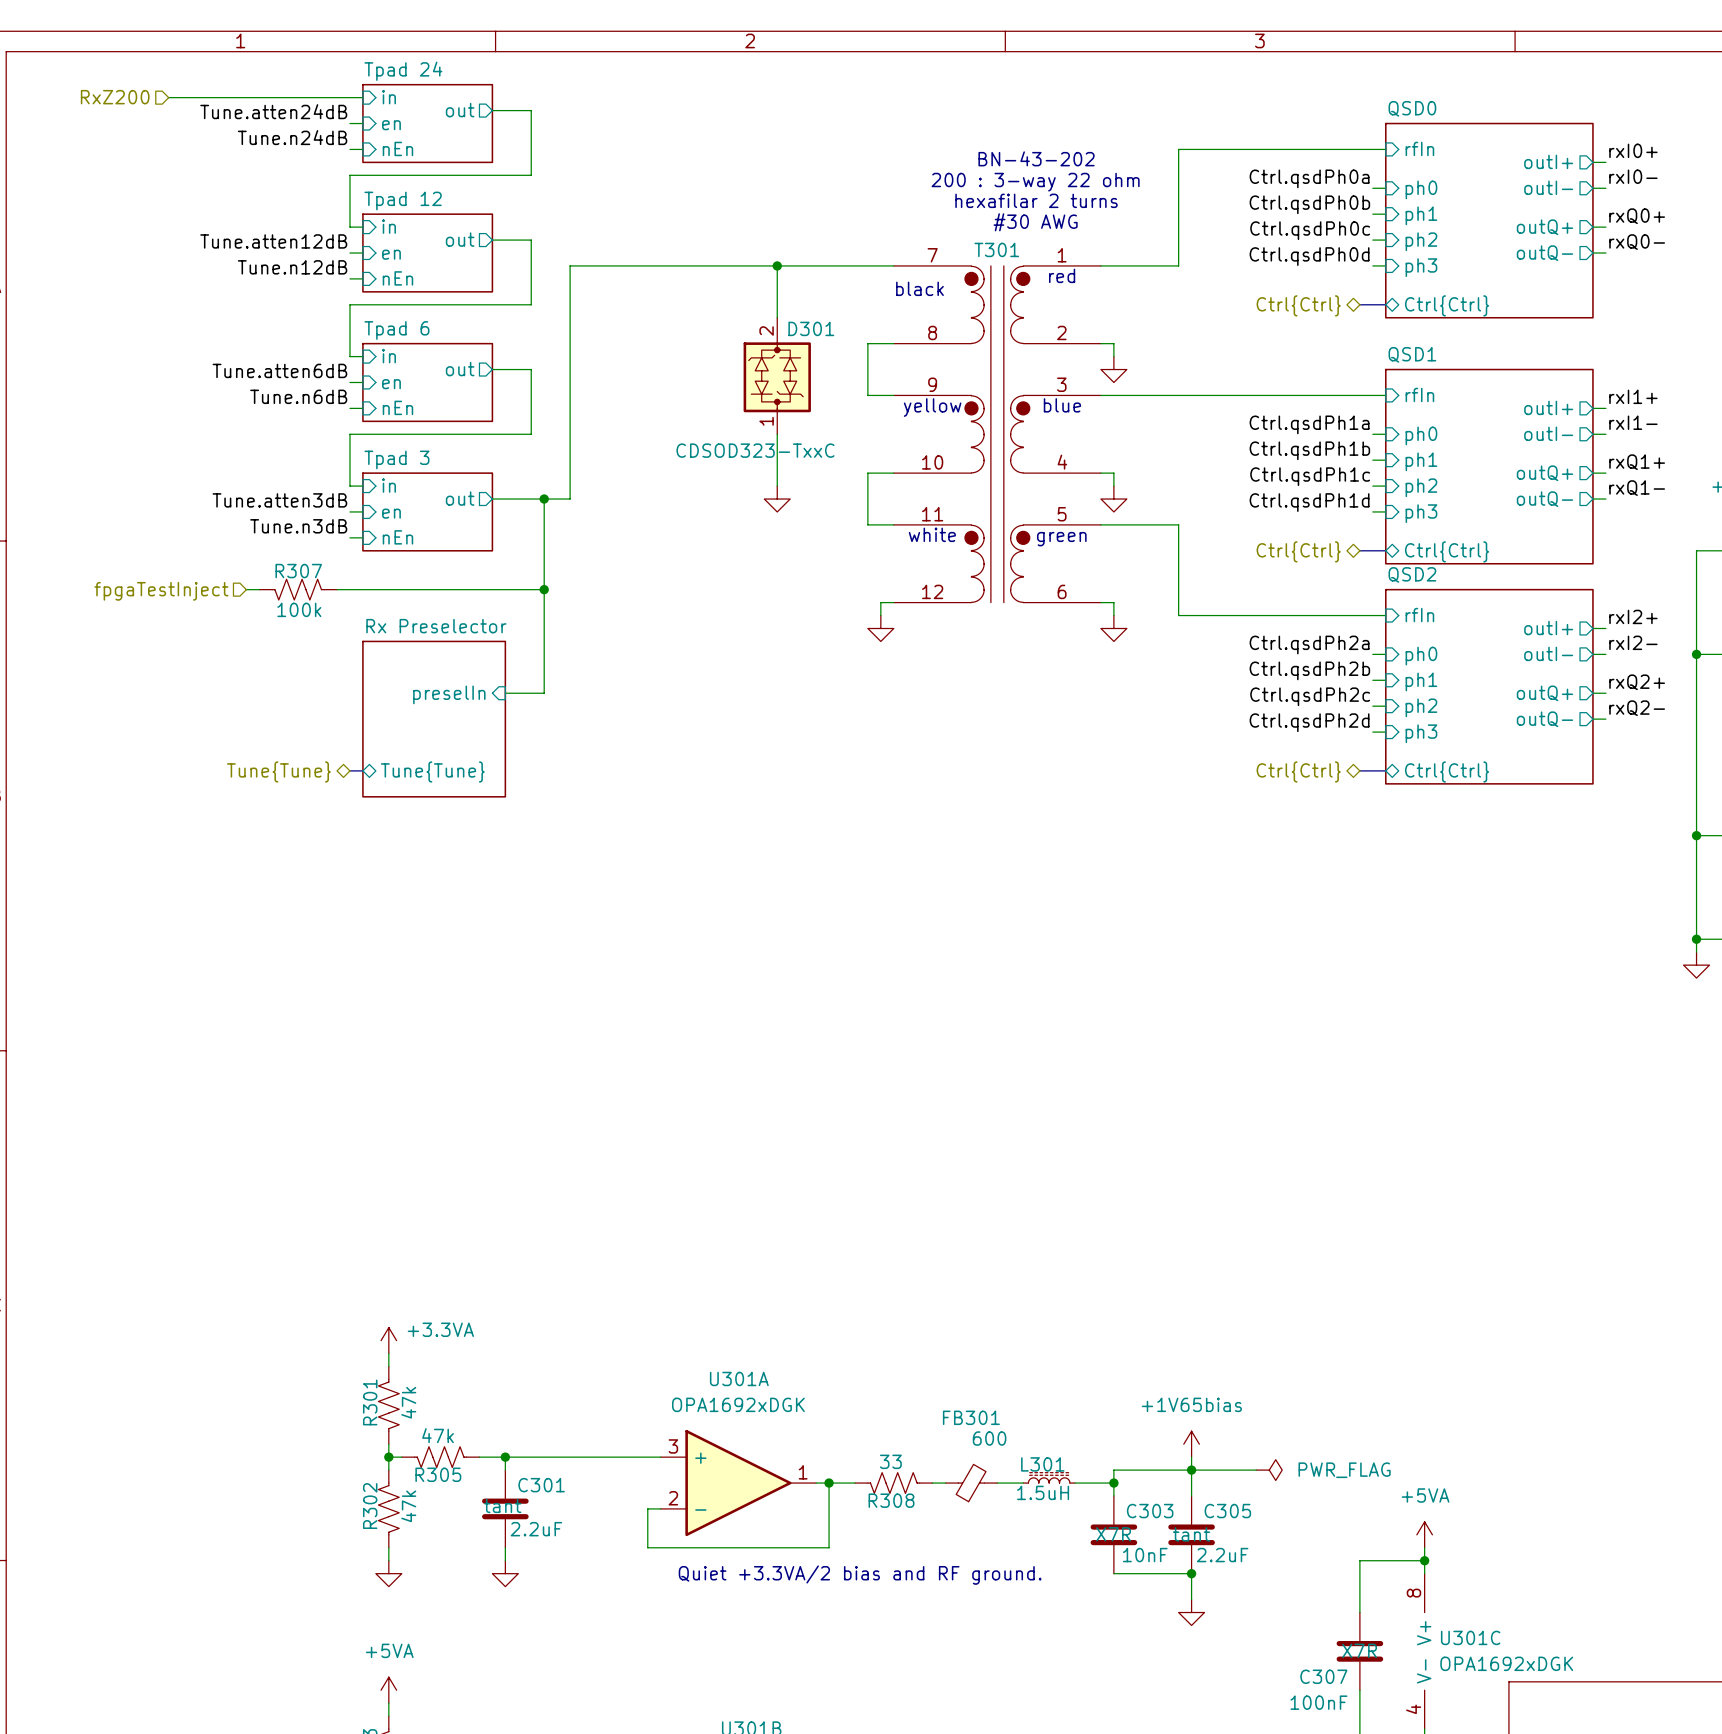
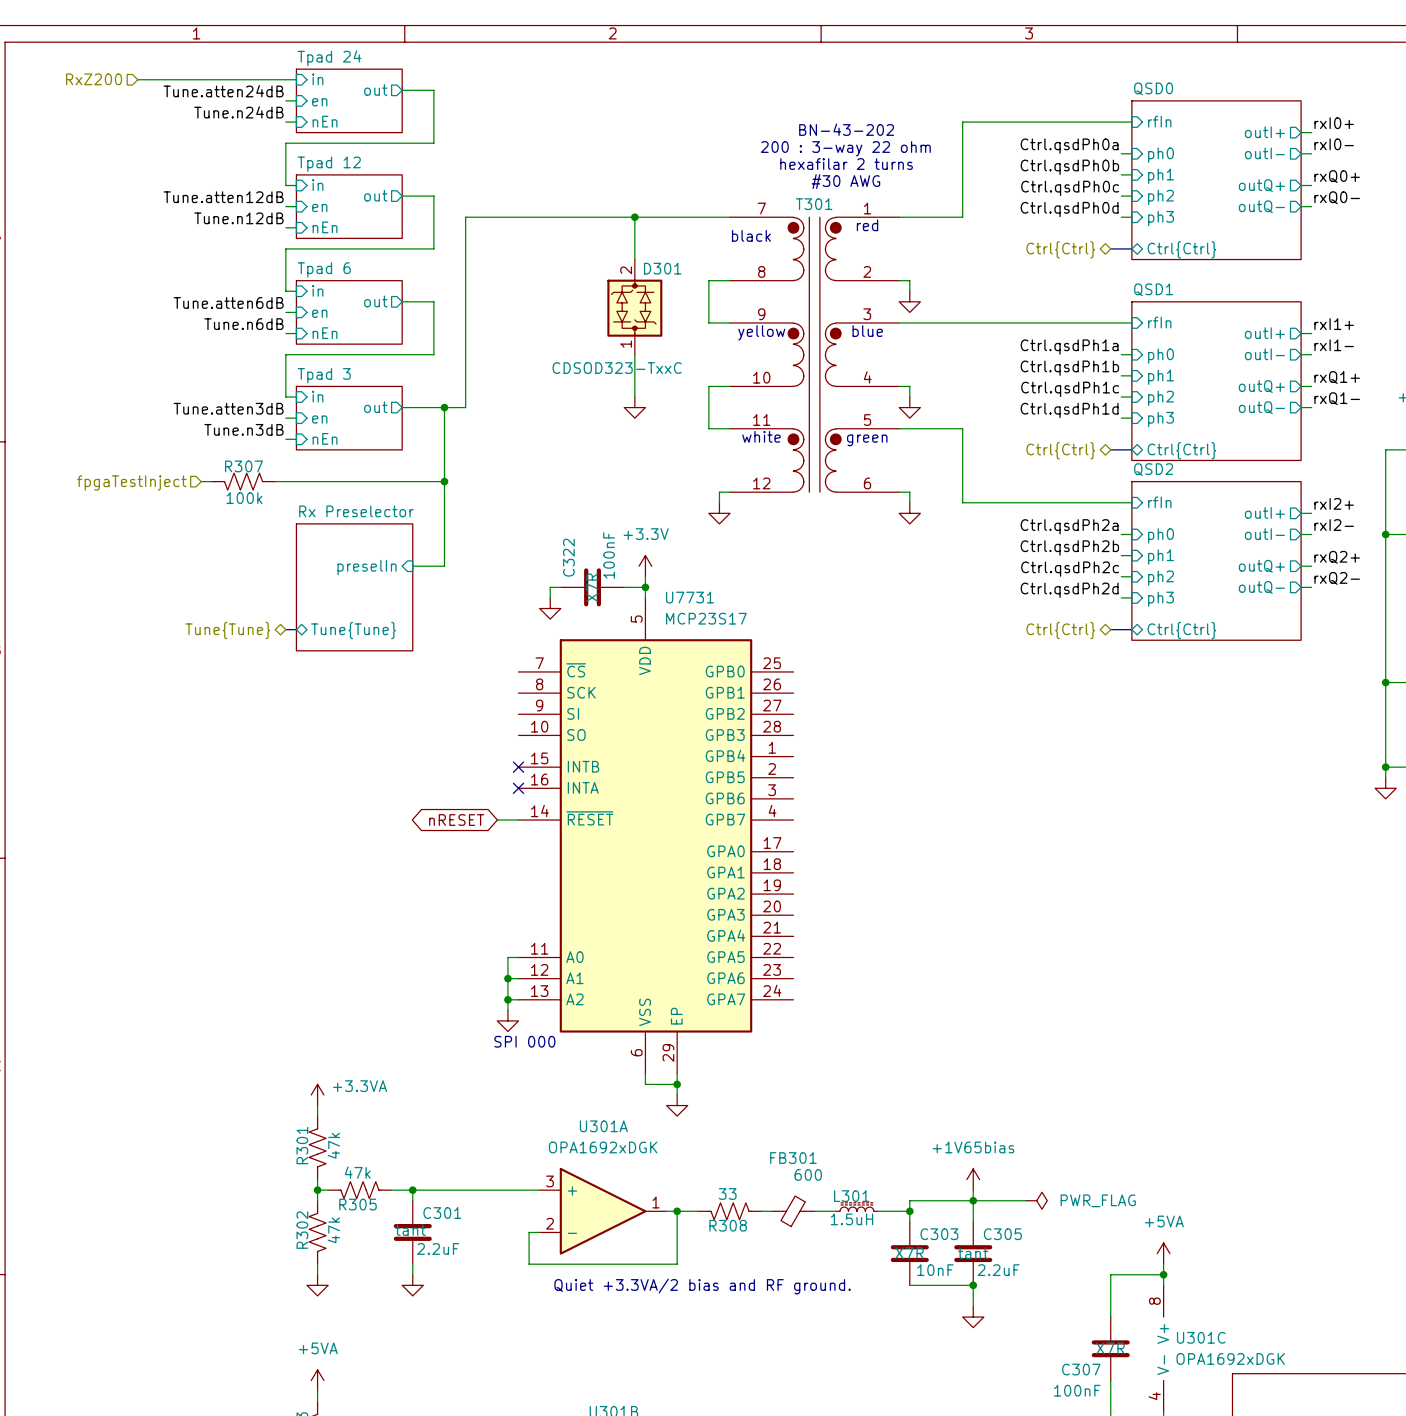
power symbol: none -> +3.3V (645, 566)
wire: none -> (645, 576) (645, 597)
wire: none -> (560, 587) (550, 587) (550, 597)
C322: none -> 100nF (592, 587)
wire: none -> (624, 587) (645, 587)
junction: none -> (645, 587)
power symbol: none -> (550, 608)
no-connect mark: none -> (518, 767)
no-connect mark: none -> (518, 788)
global label: none -> nRESET (456, 820)
wire: none -> (497, 820) (518, 820)
U7731: none -> MCP23S17 (655, 835)
wire: none -> (518, 957) (507, 957) (507, 1010)
wire: none -> (507, 978) (518, 978)
junction: none -> (507, 978)
wire: none -> (507, 999) (518, 999)
junction: none -> (507, 999)
power symbol: none -> (507, 1020)
text: none -> SPI 000 (524, 1041)
wire: none -> (645, 1073) (645, 1084) (677, 1084)
wire: none -> (677, 1073) (677, 1094)
junction: none -> (677, 1084)
power symbol: none -> (677, 1105)

